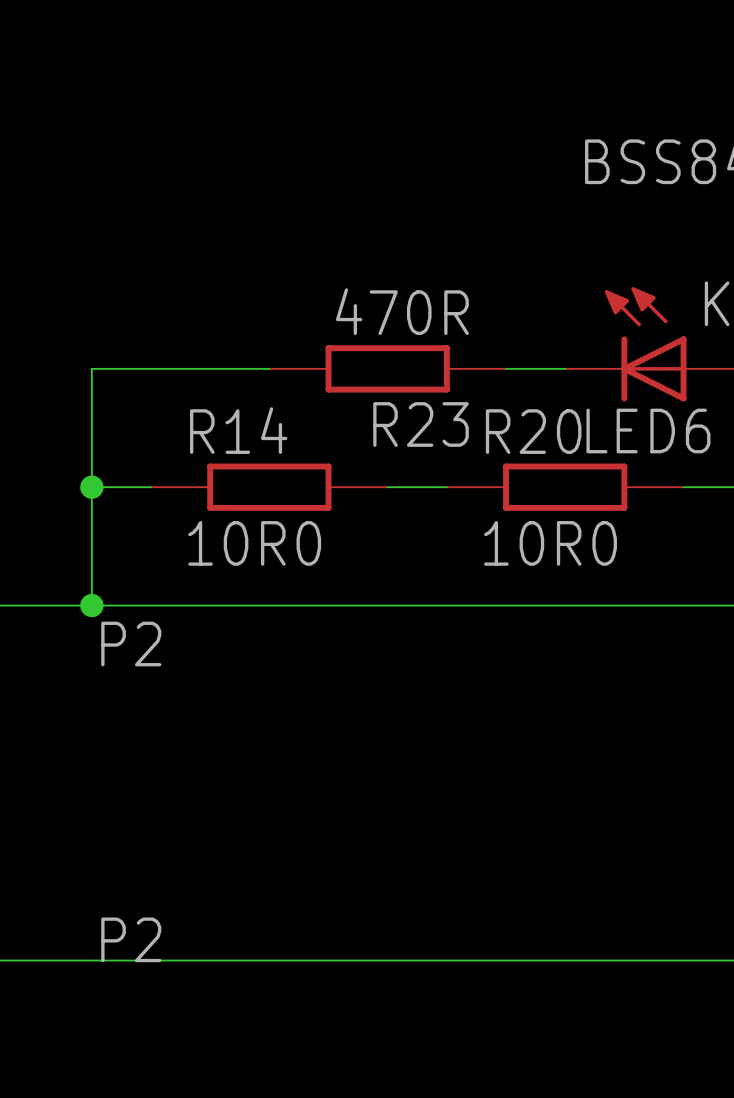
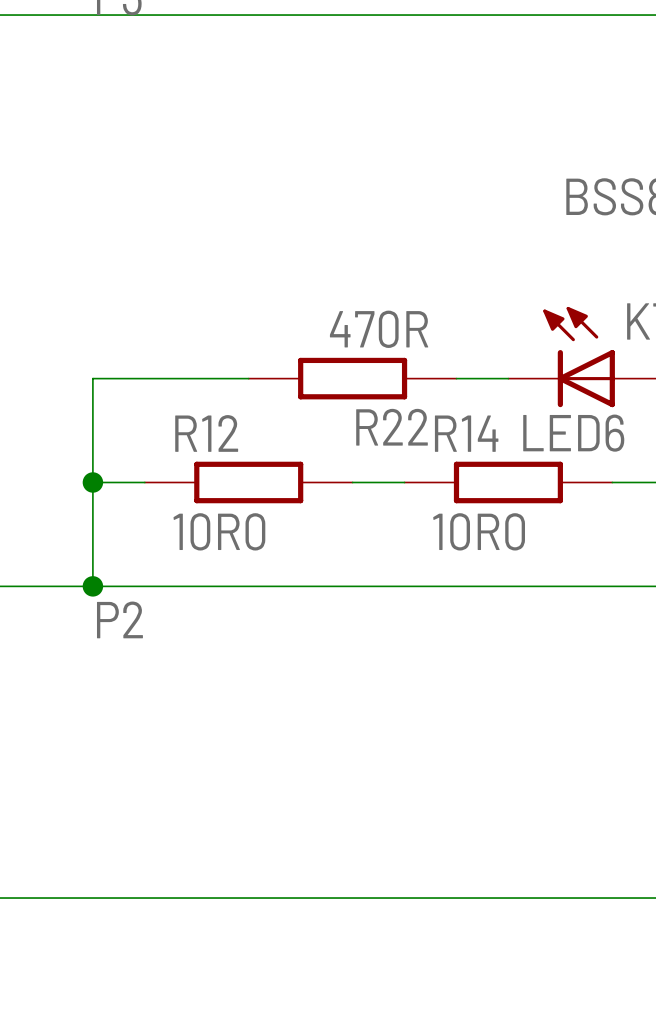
R23 name: R23 (421, 424) -> R22 (392, 427)
R14 name: R14 (238, 430) -> R12 (206, 433)
R20 name: R20 (533, 431) -> R14 (466, 433)
label: P2 (131, 939) -> none

